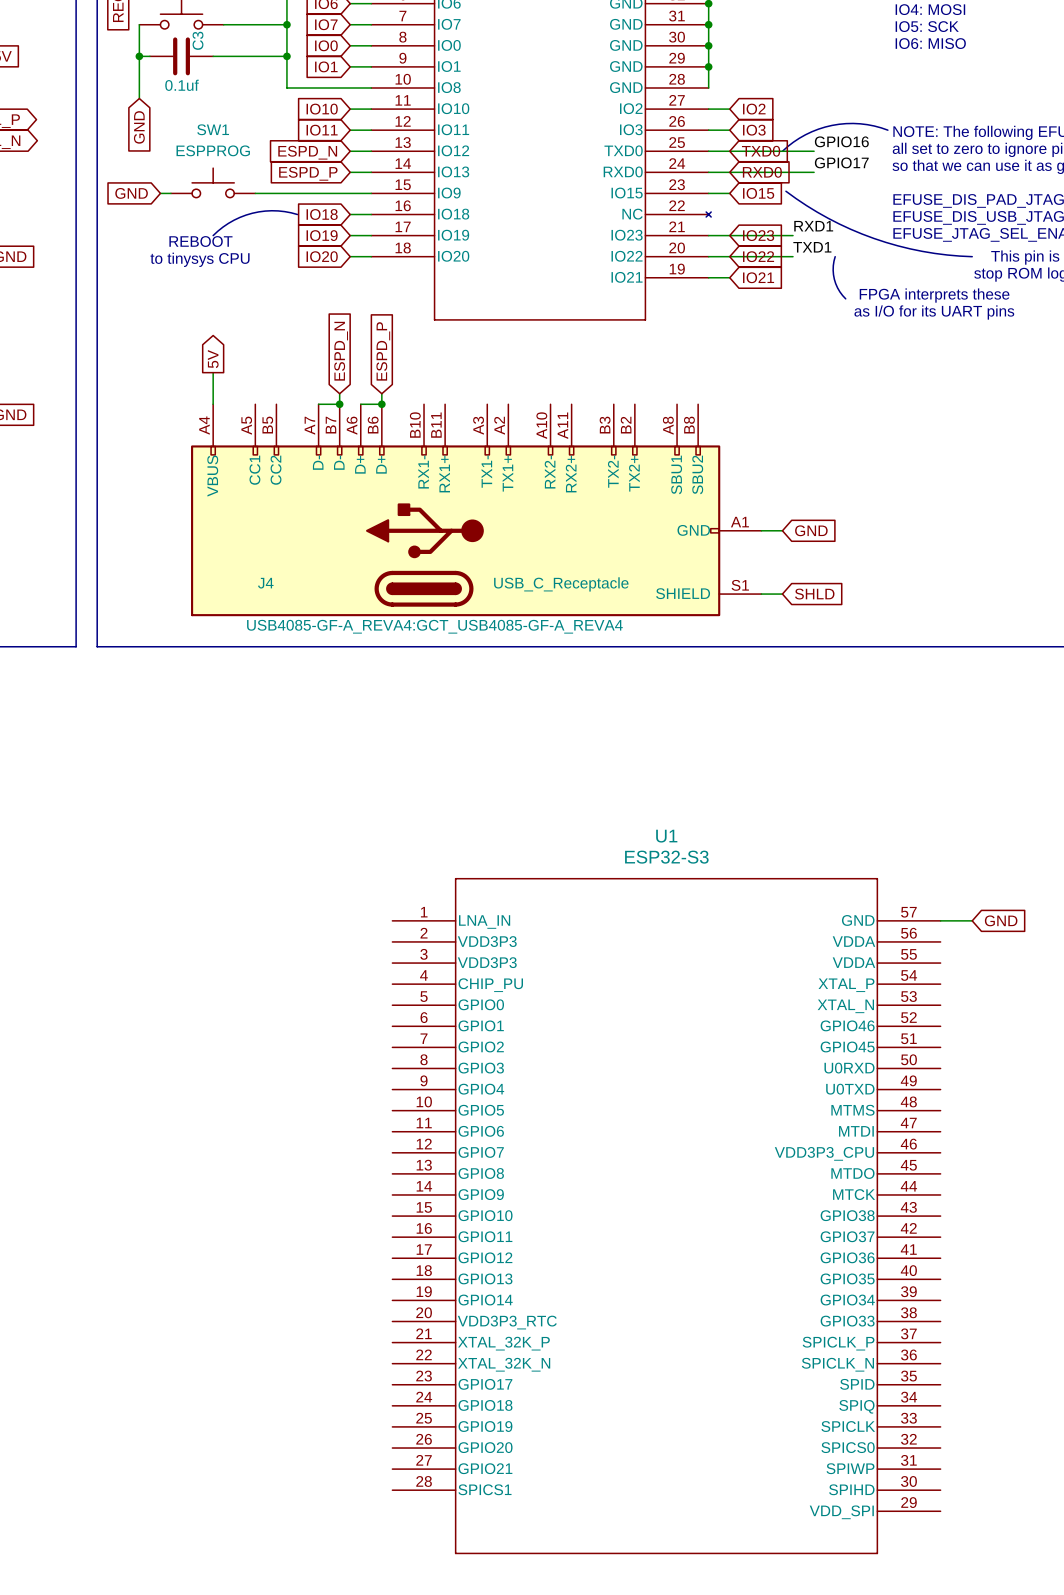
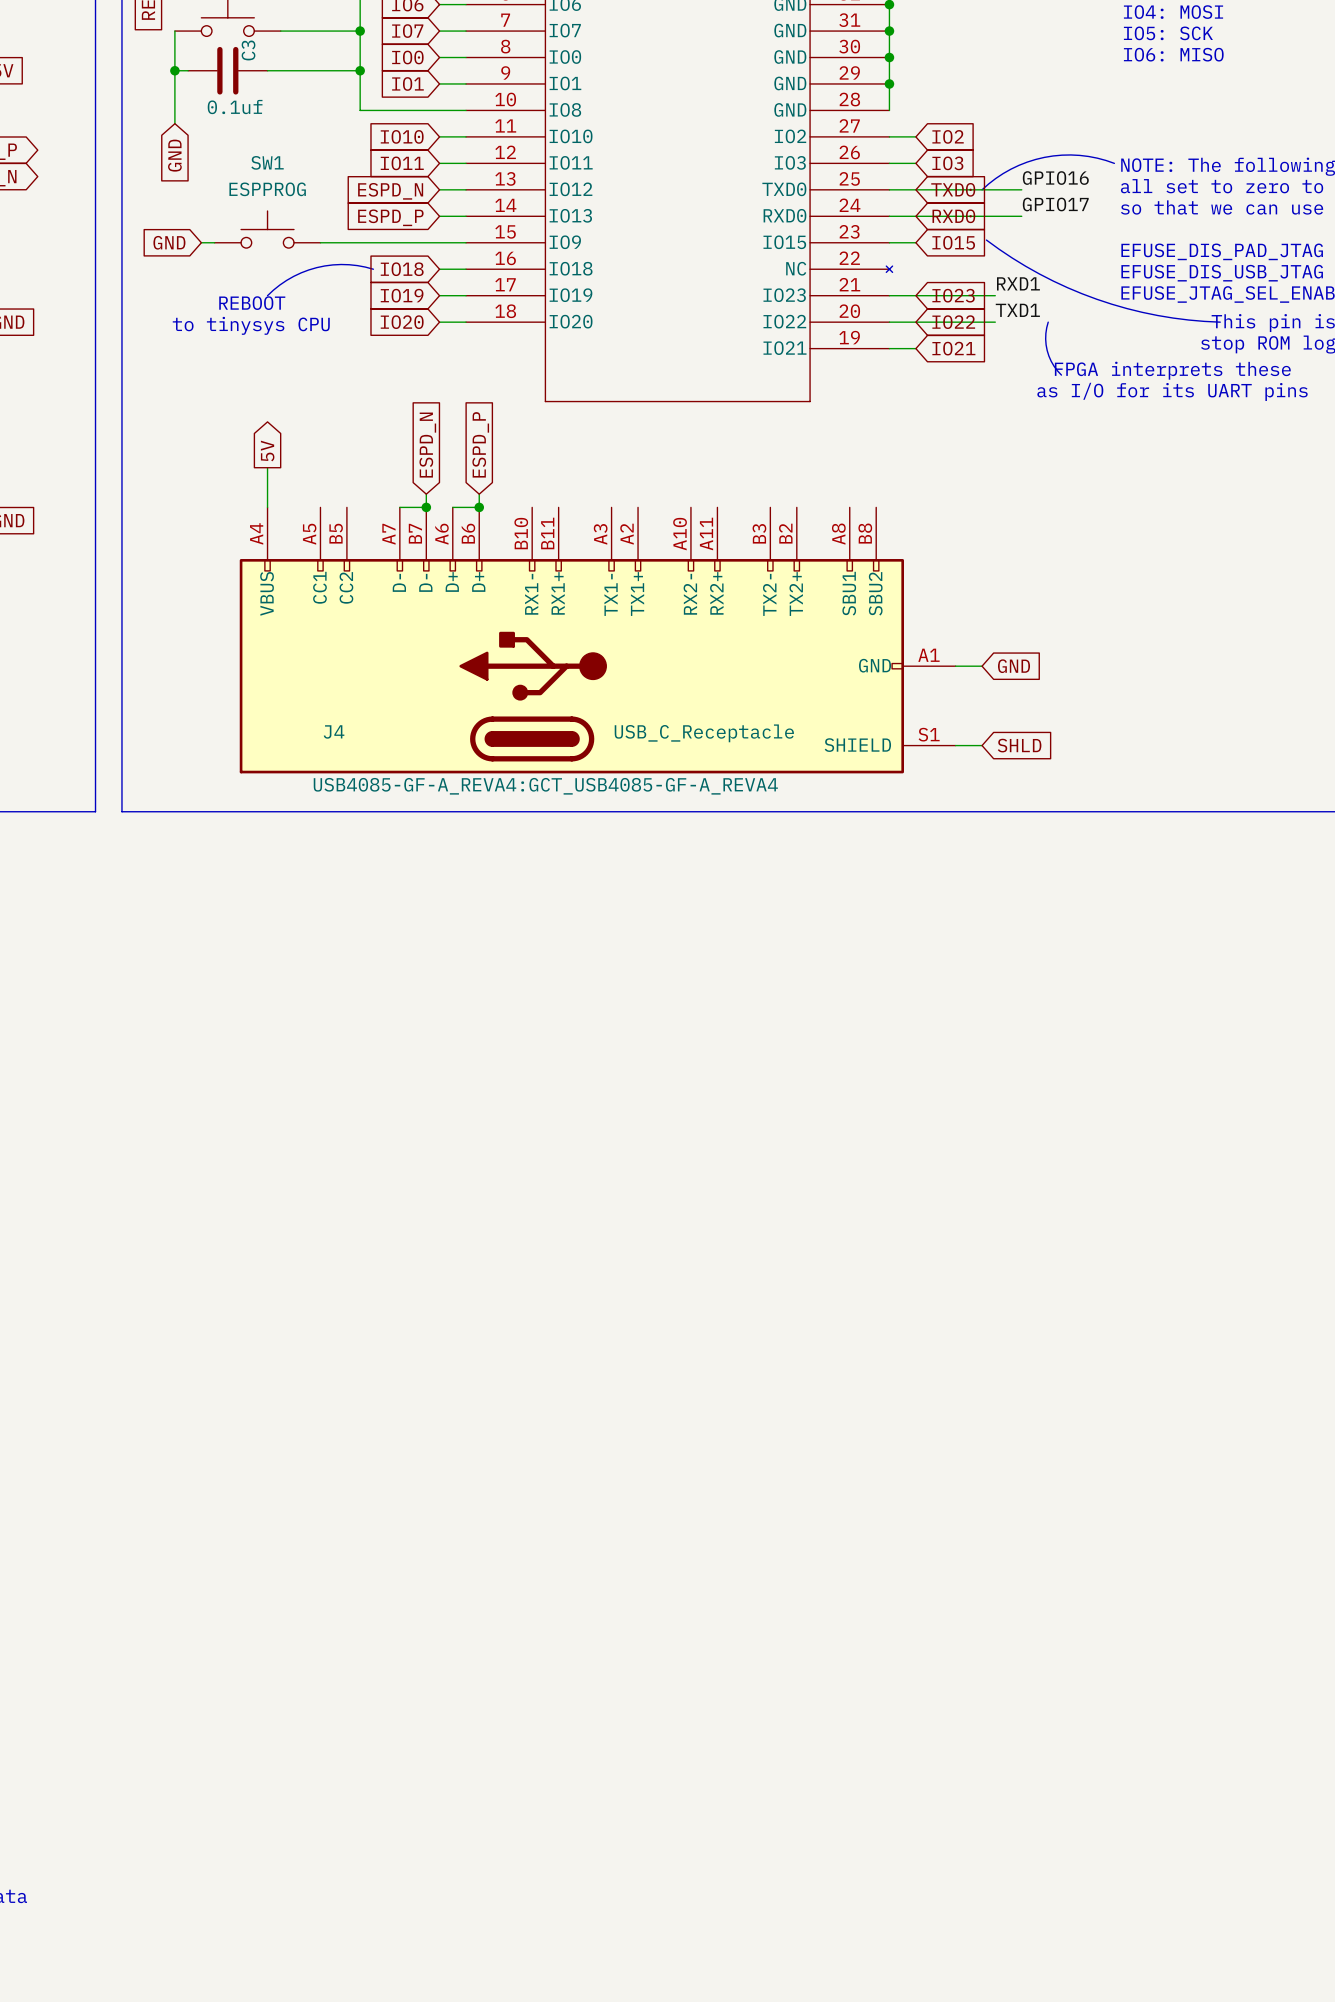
wire: (940, 920) (972, 920) -> none
global label: GND (1001, 920) -> none
U1: ESP32-S3 (666, 1216) -> none

